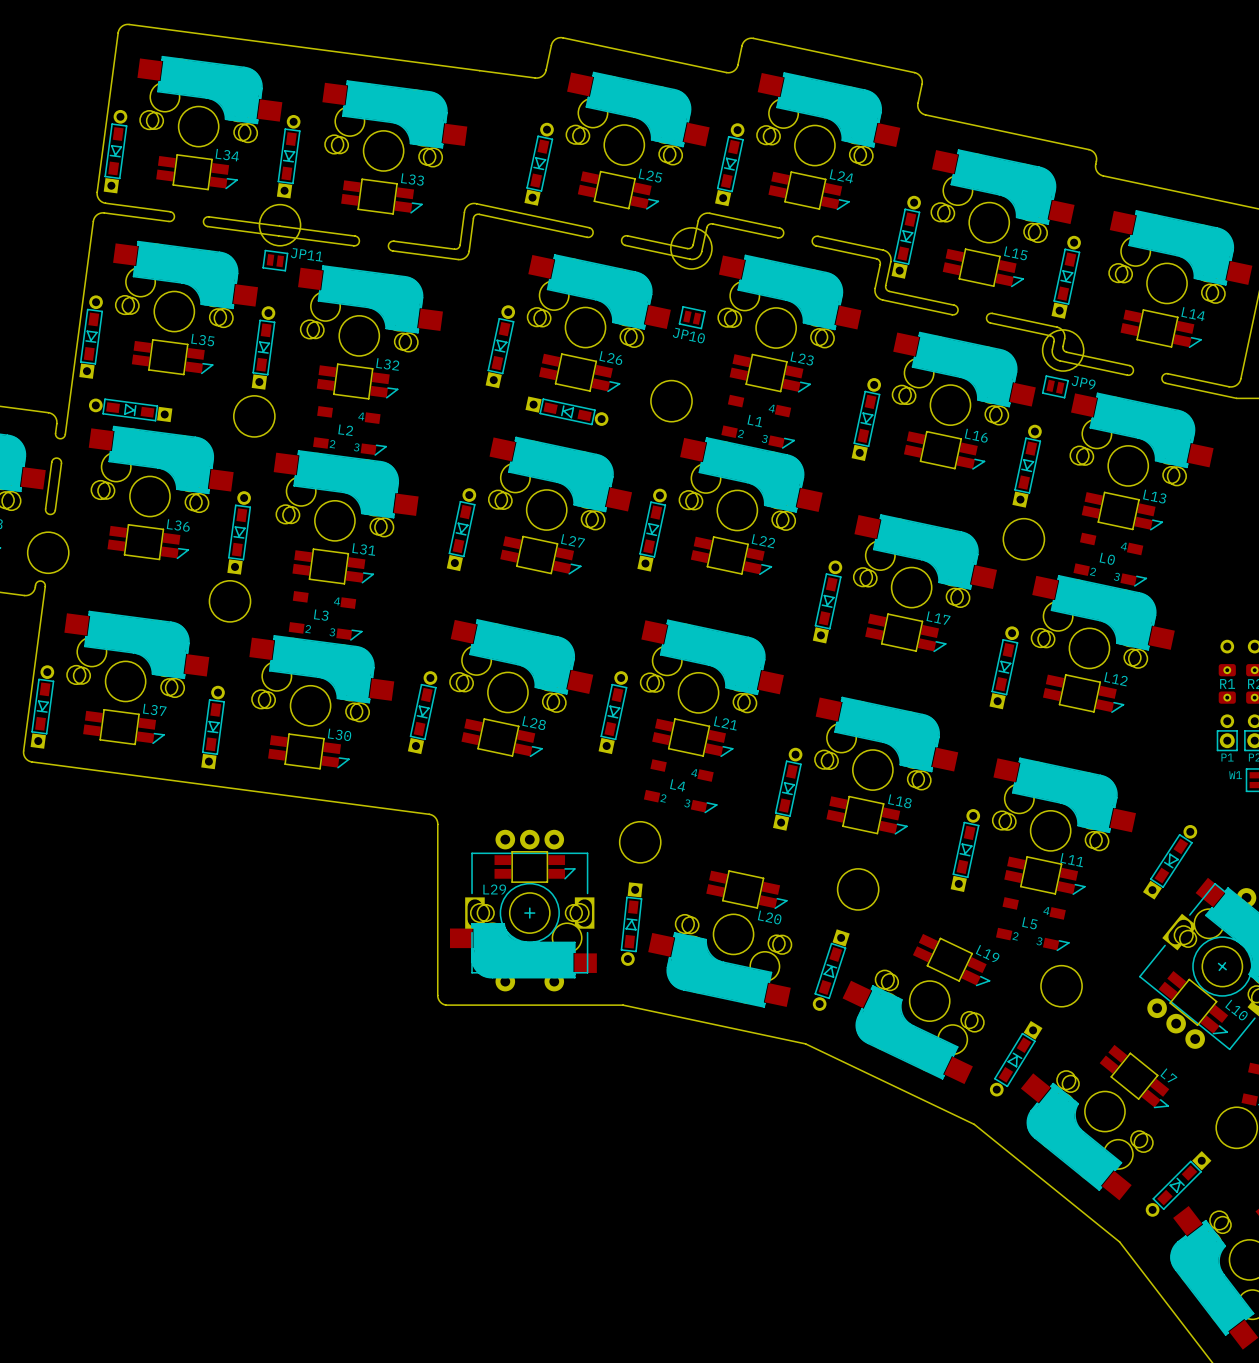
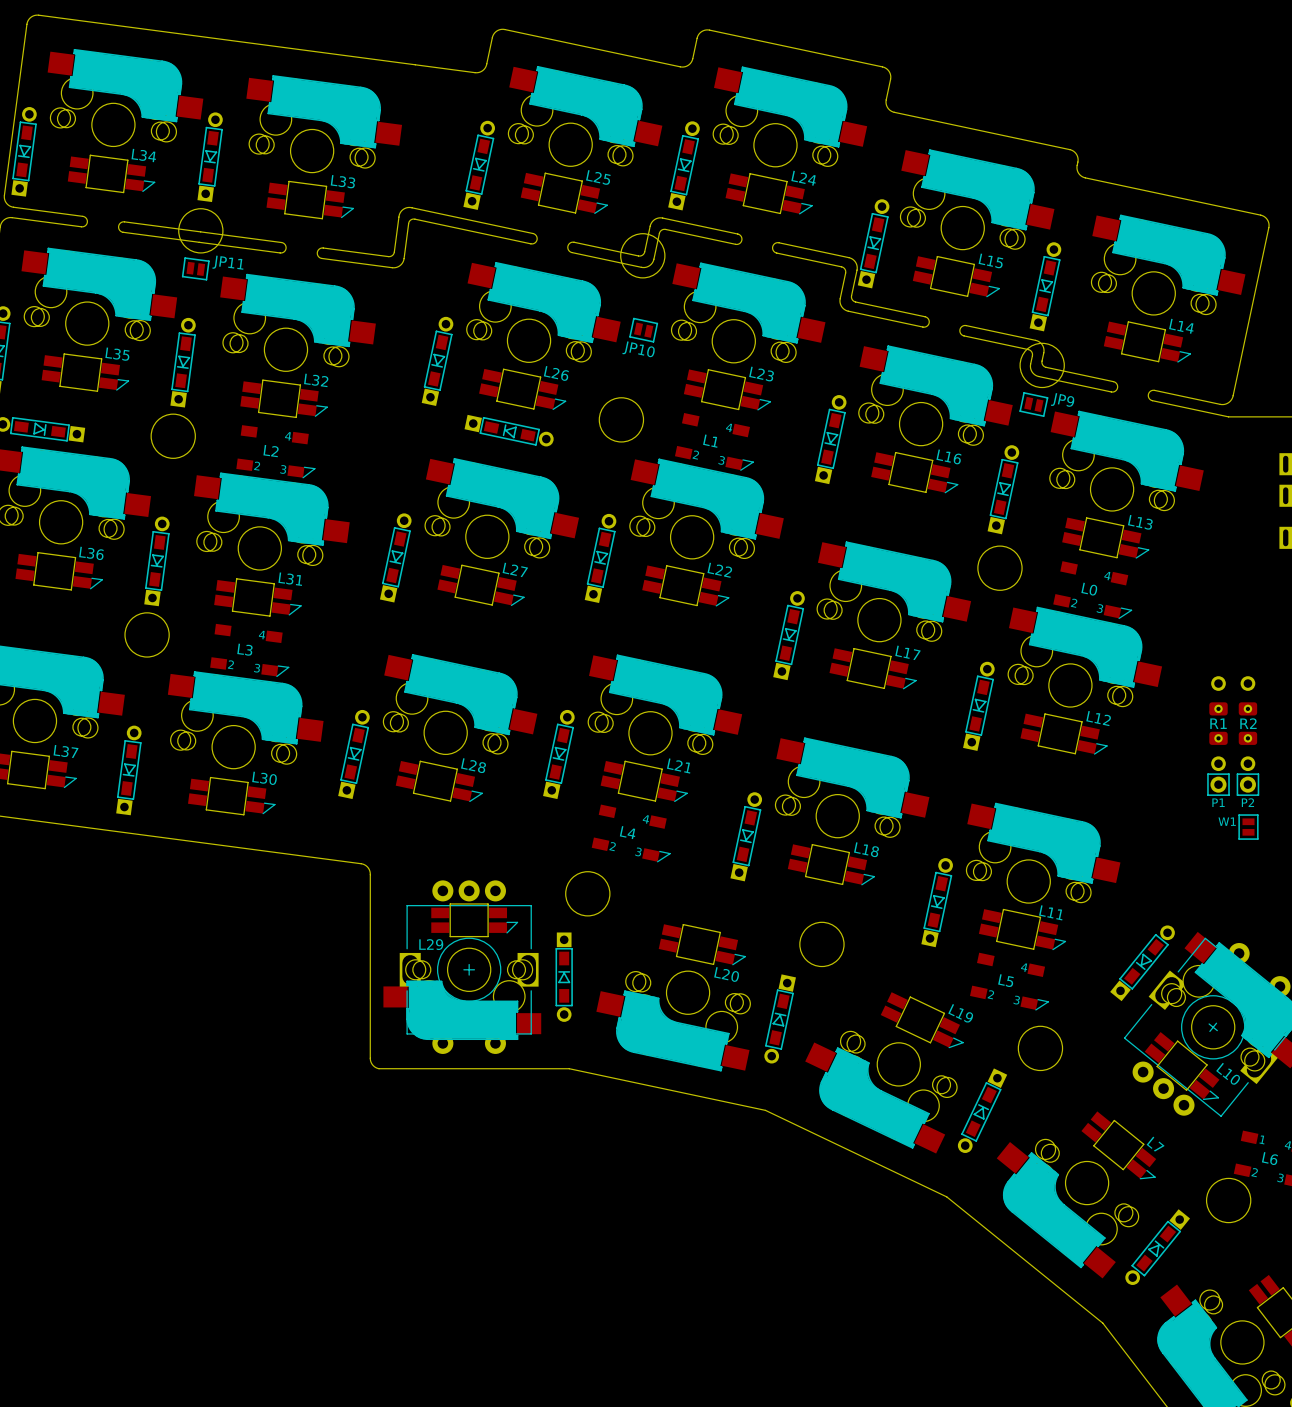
part: (1170, 862) -> none
part: none -> (1142, 963)
part: none -> (564, 977)
part: (631, 924) -> none
part: none -> (780, 1018)
part: (831, 970) -> none
part: none -> (982, 1110)
part: (1016, 1058) -> none
part: none -> (1157, 1247)
part: (1178, 1183) -> none

